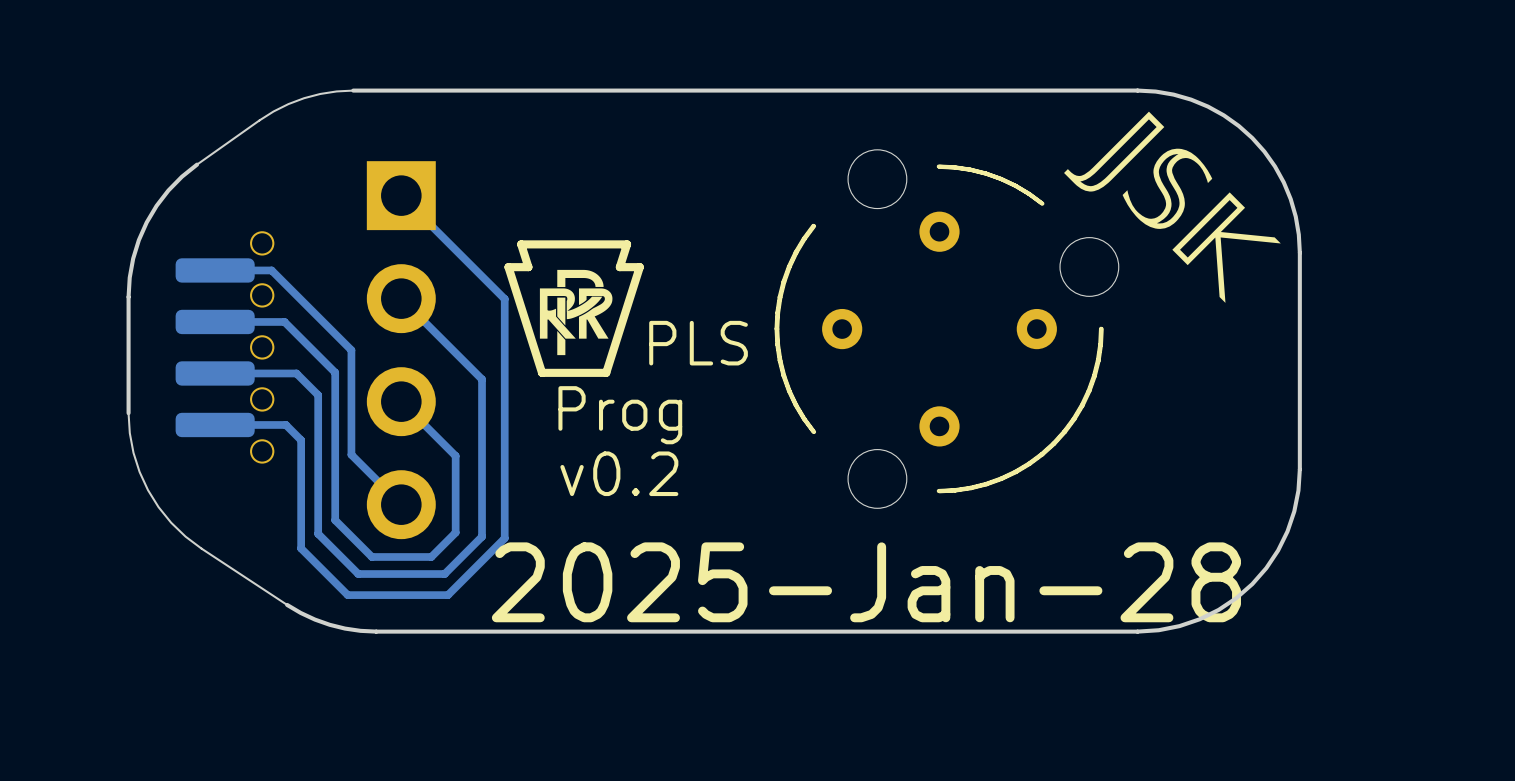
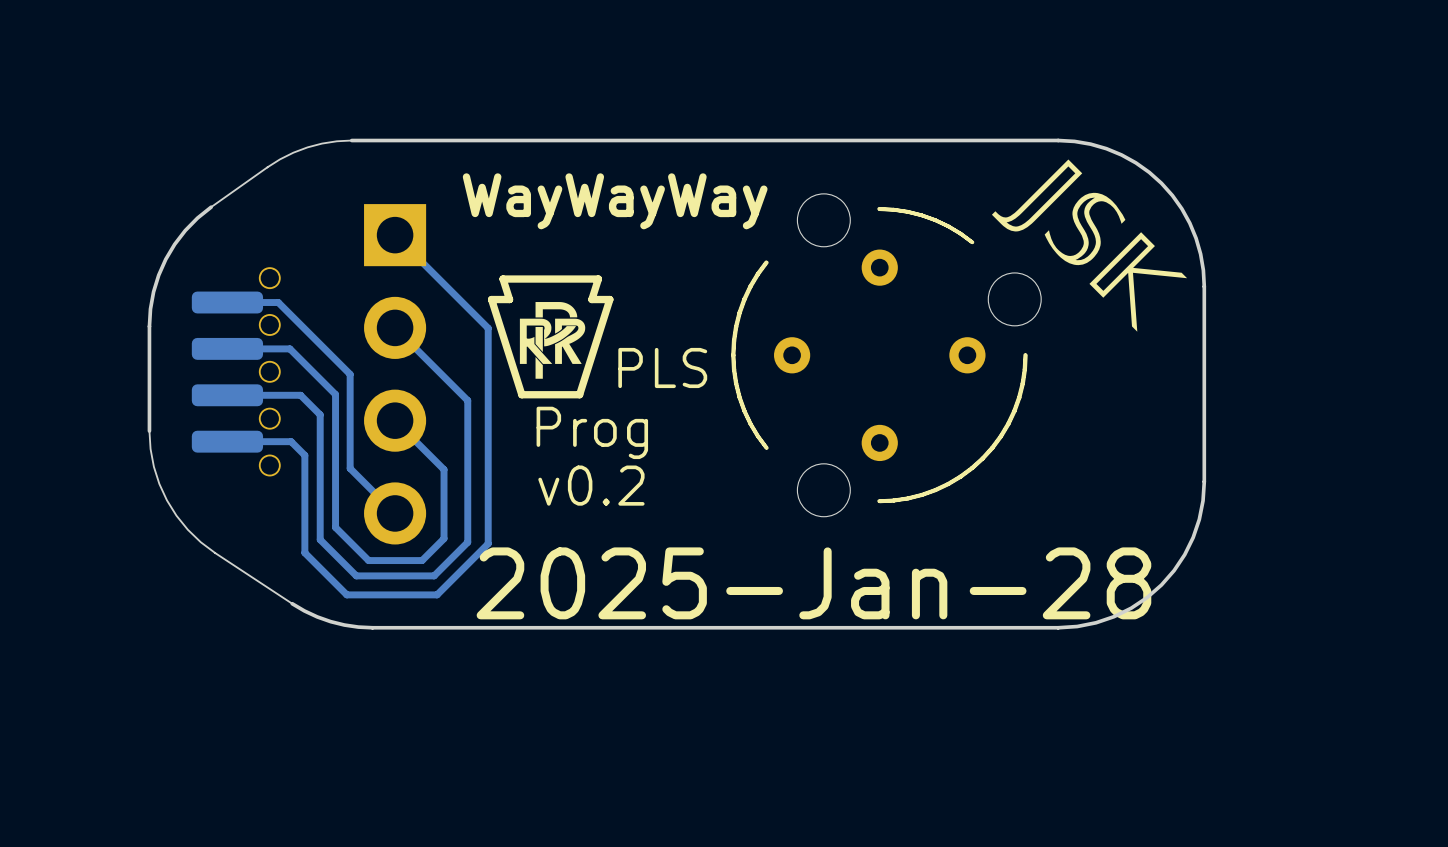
text: none -> WayWayWay (615, 201)

